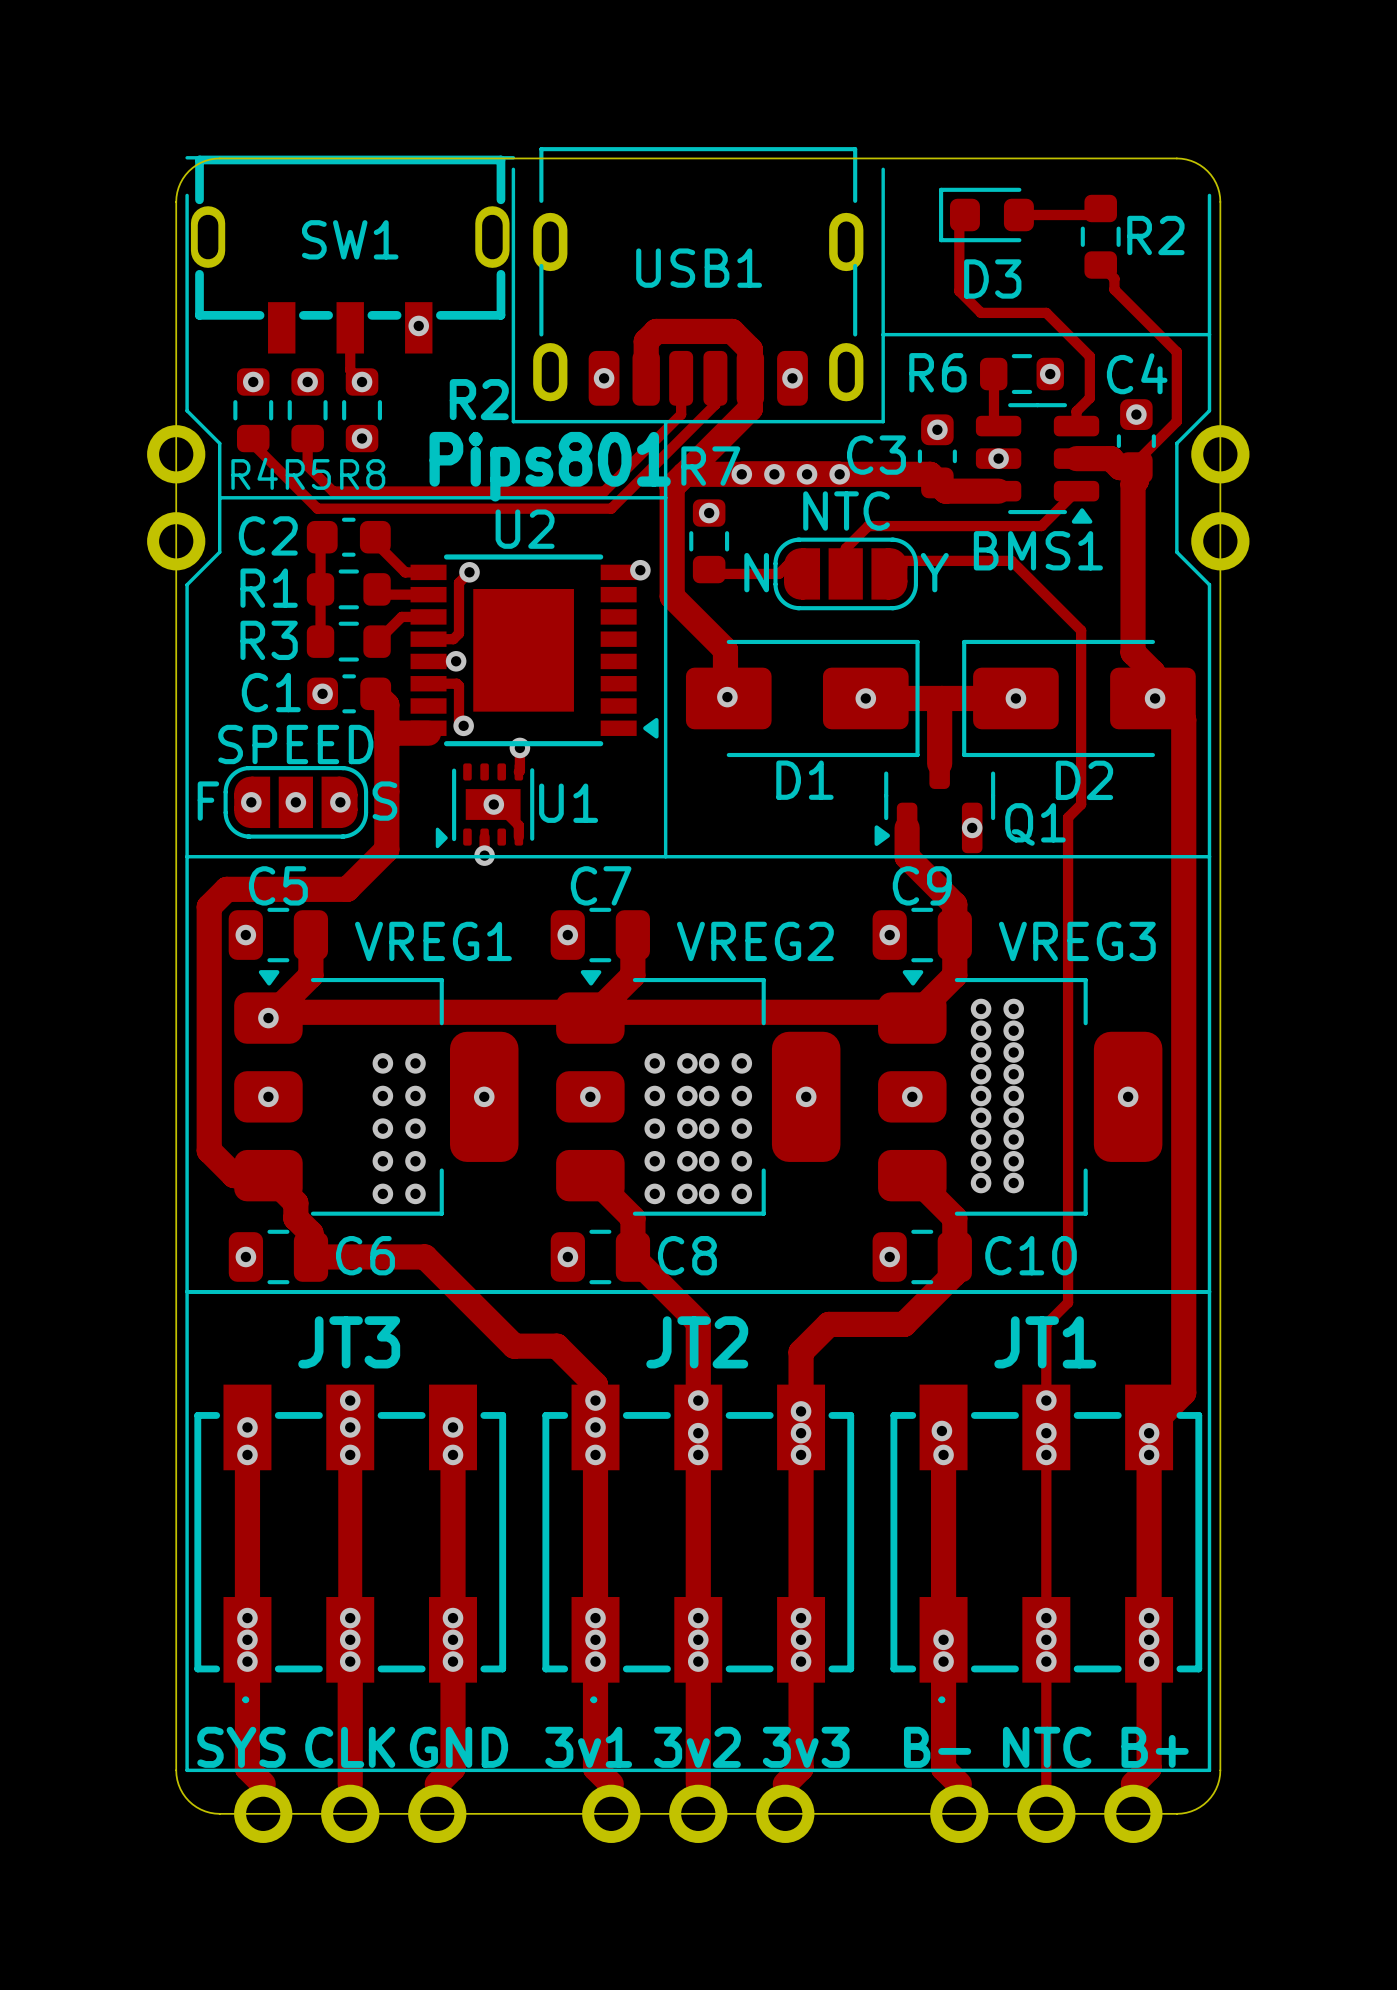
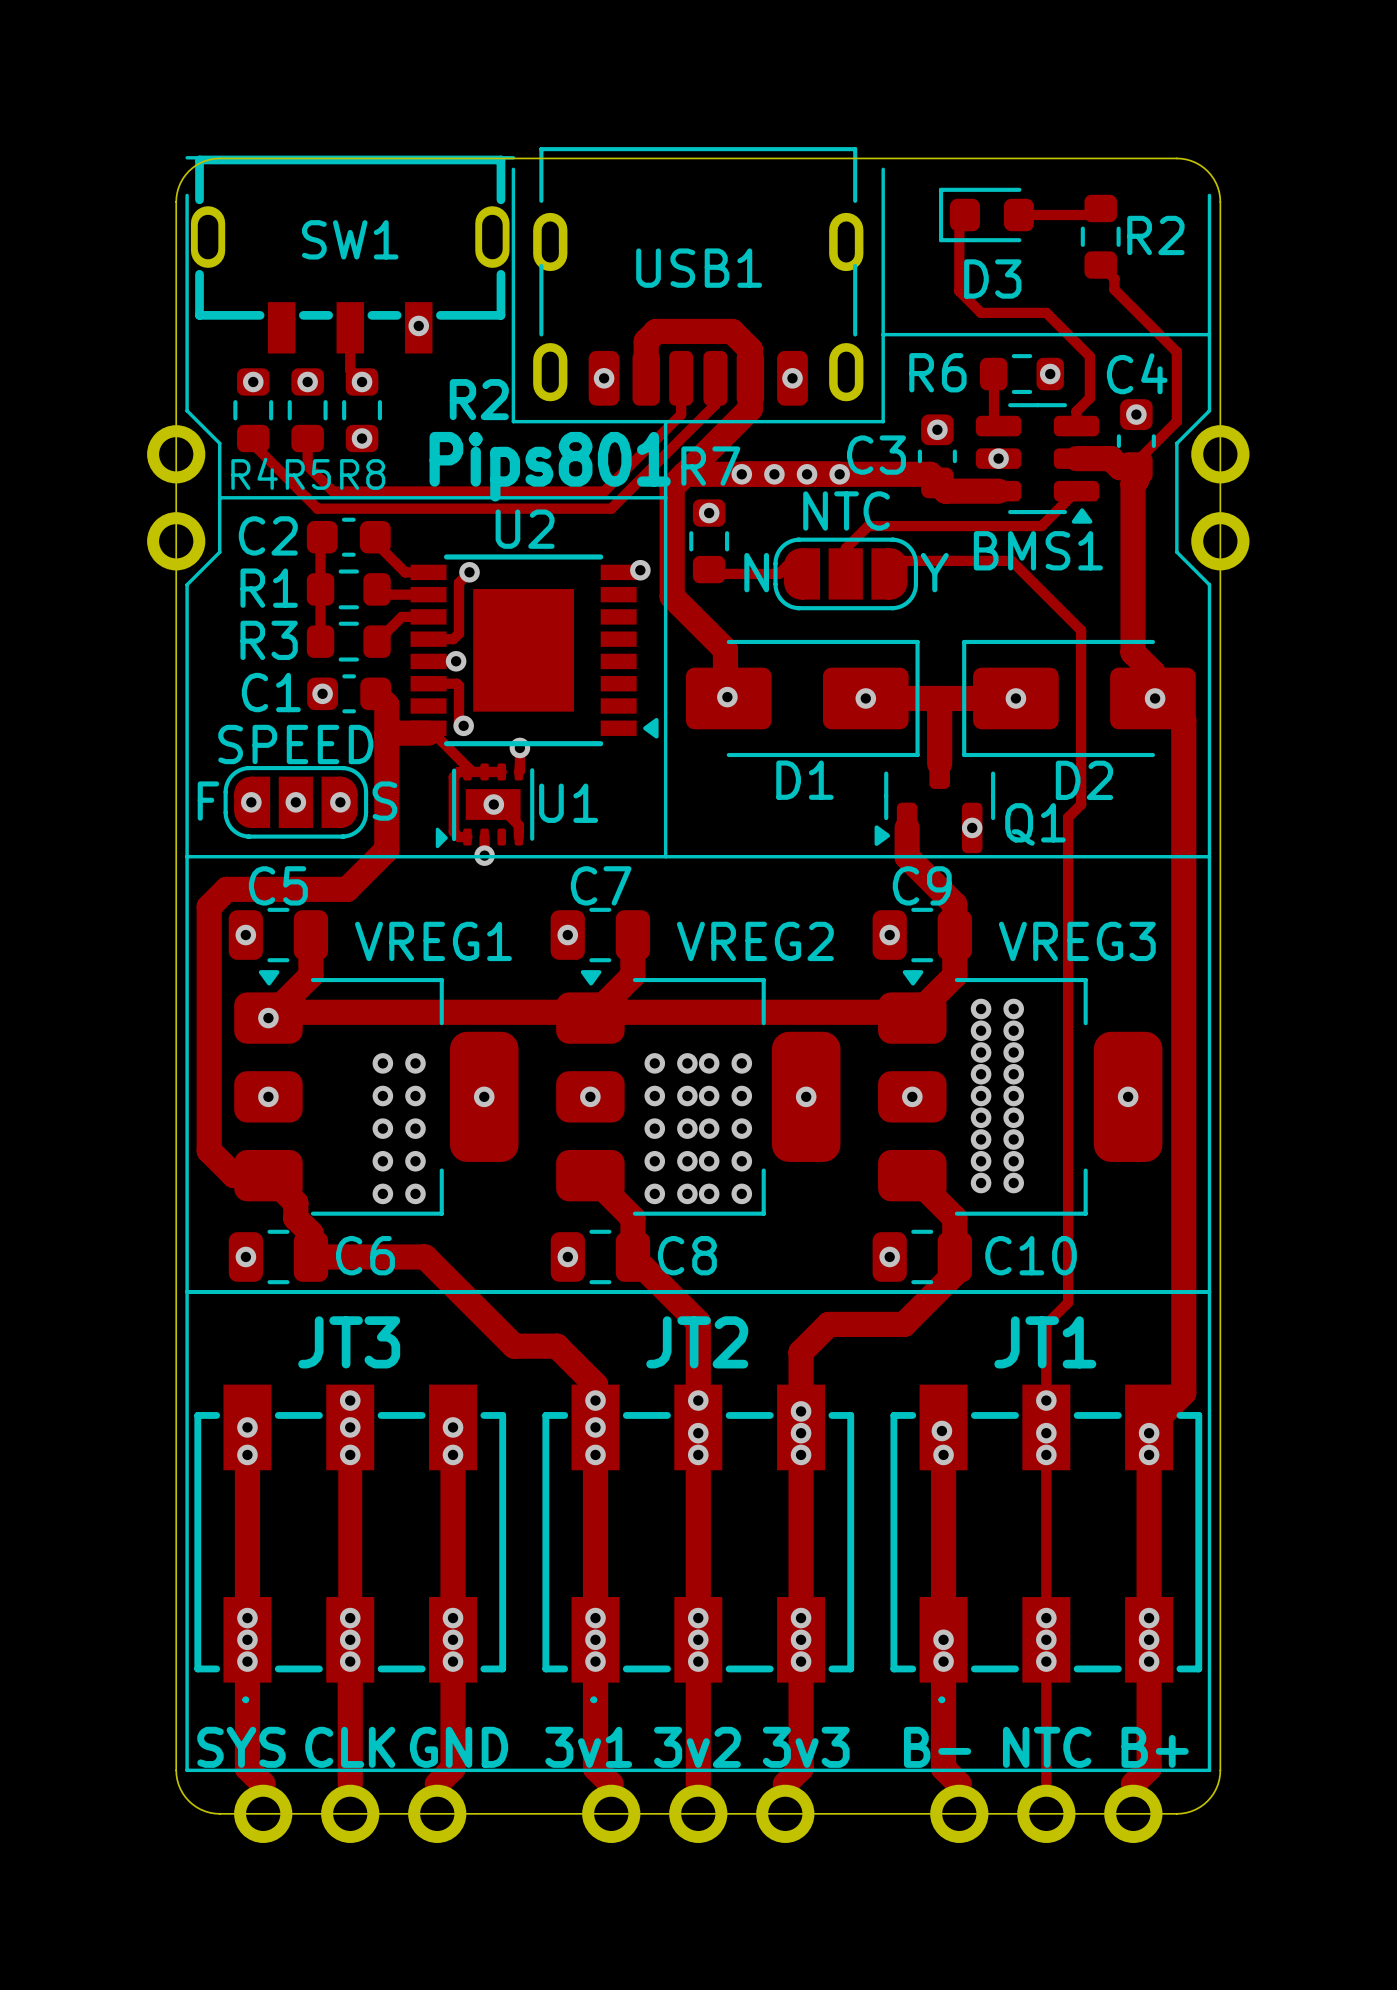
track: none -> (428, 728) (472, 771) (501, 771)
track: none -> (467, 771) (458, 771) (453, 777) (453, 831) (458, 837) (467, 837)

